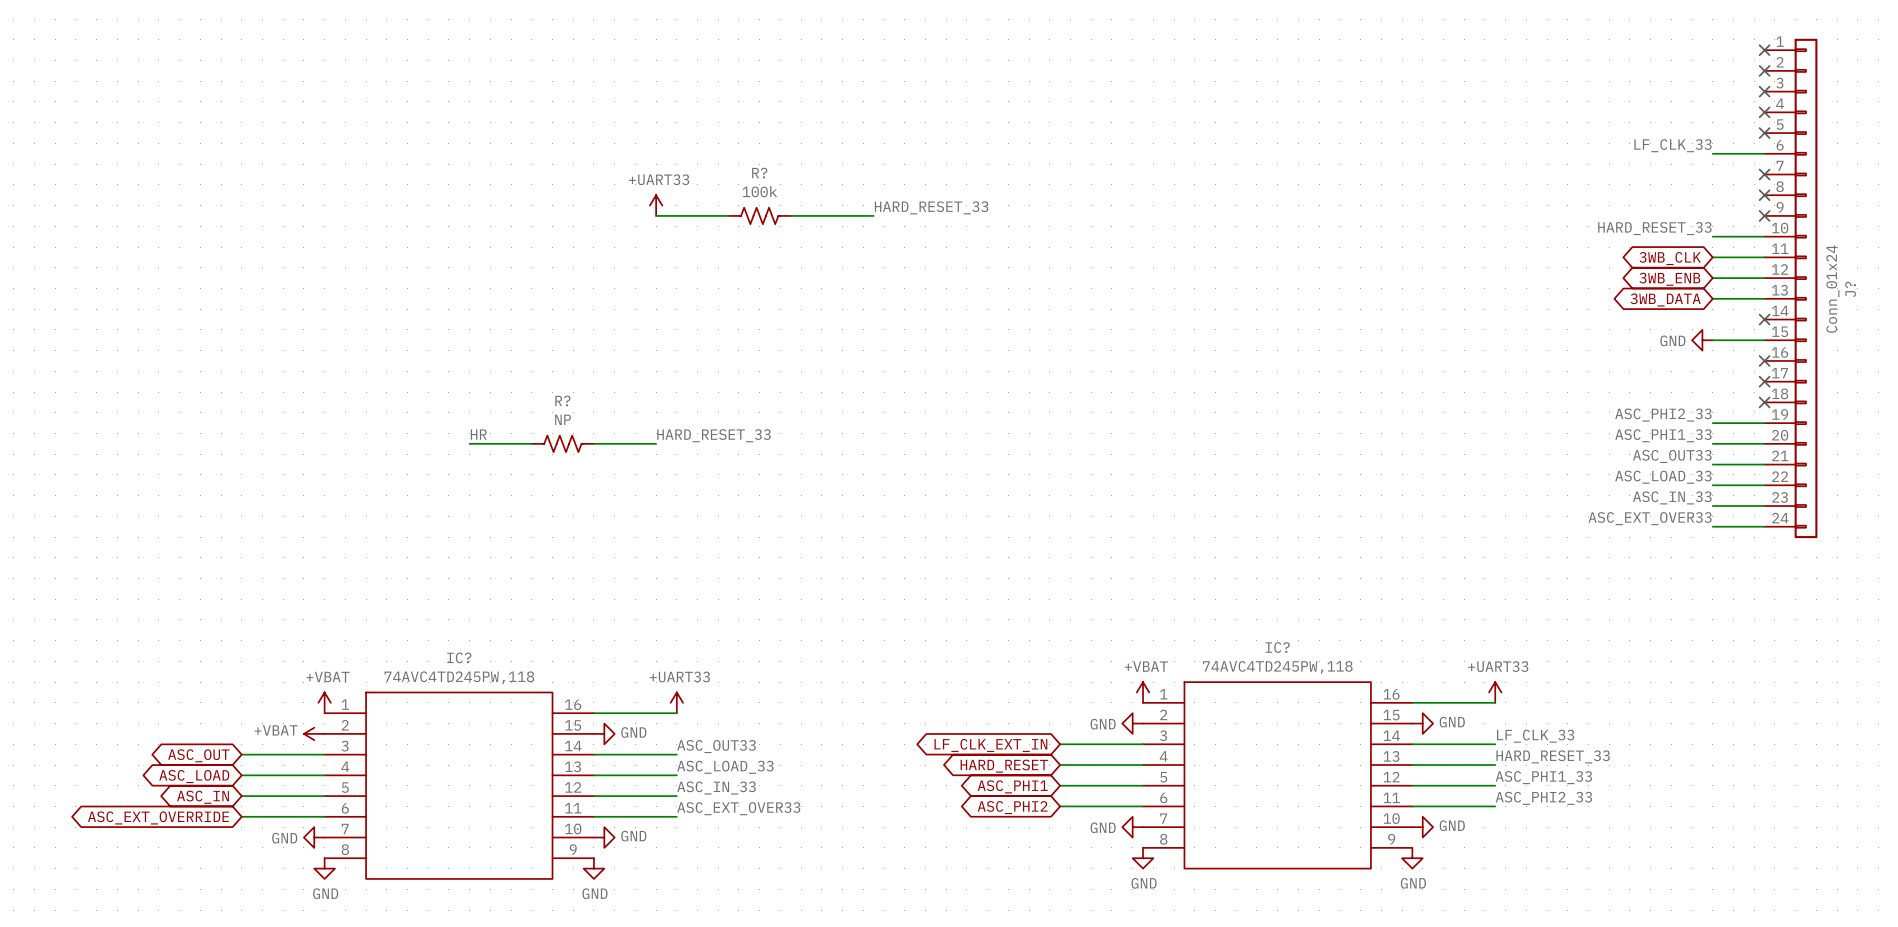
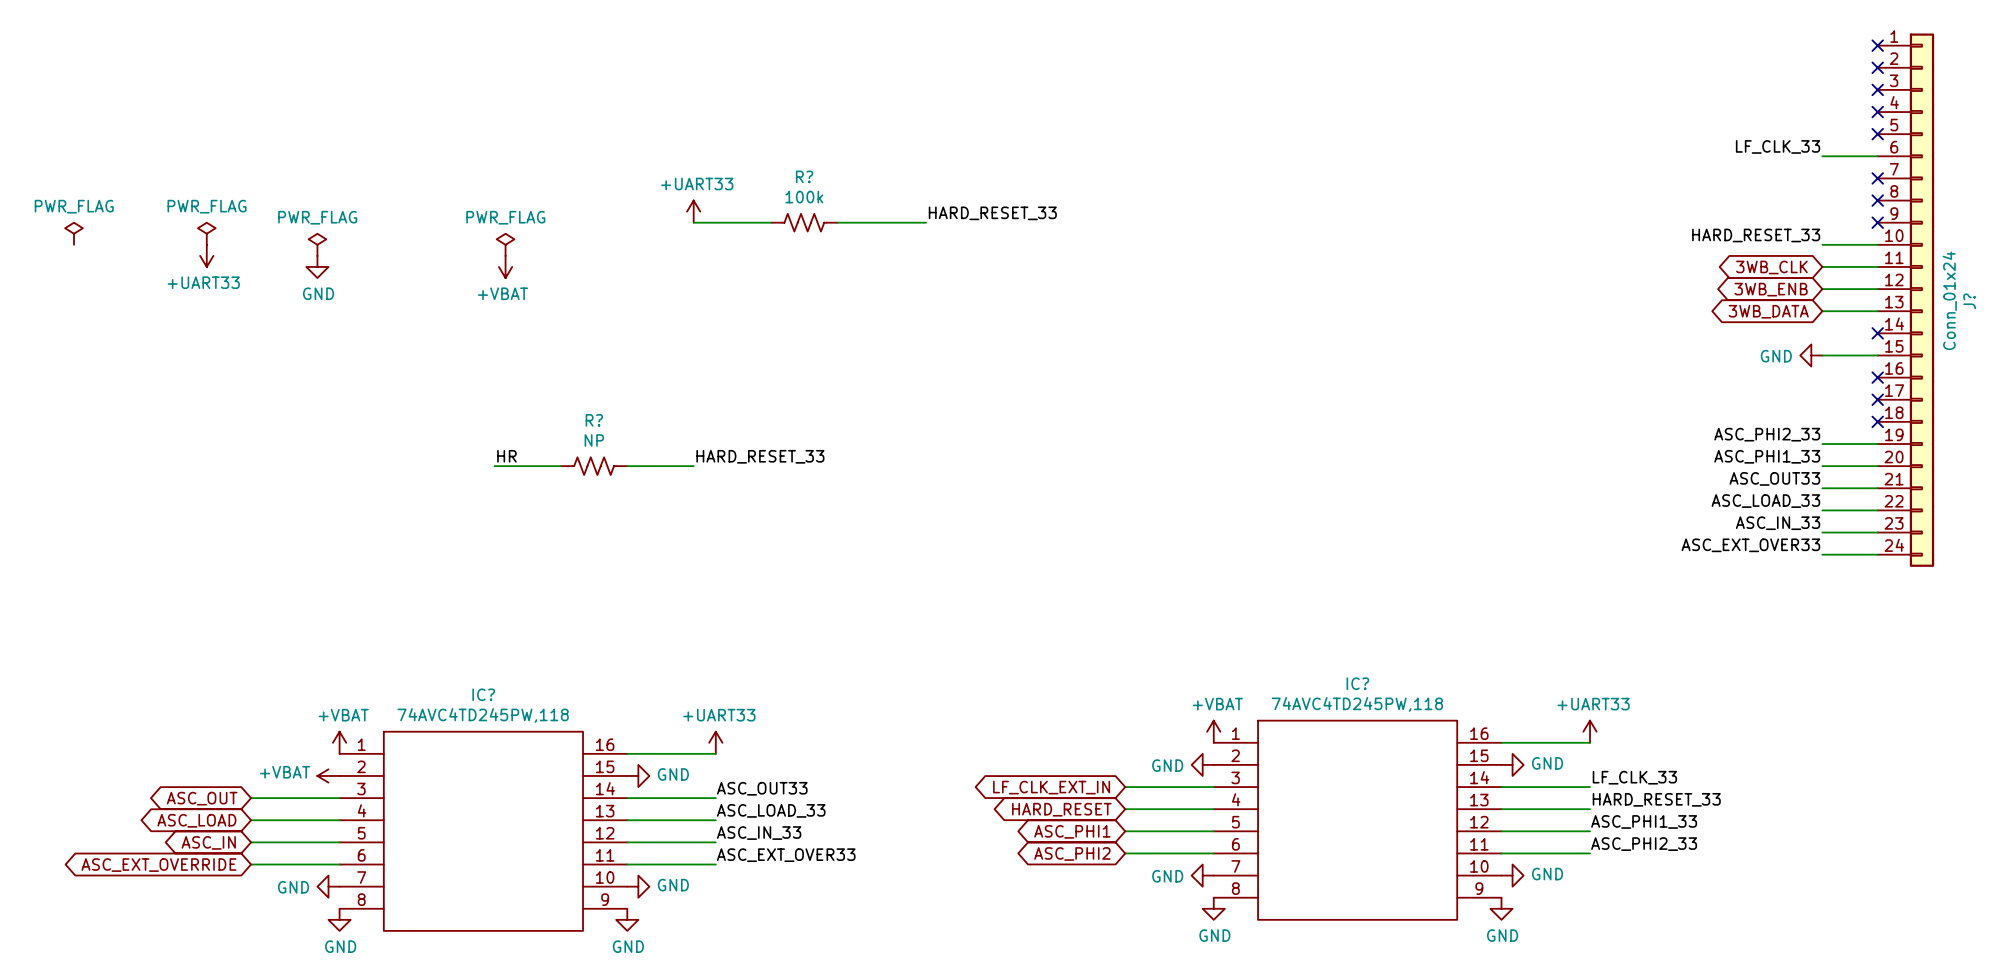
power symbol: none -> PWR_FLAG (73, 233)
power symbol: none -> PWR_FLAG (206, 233)
power symbol: none -> PWR_FLAG (317, 244)
power symbol: none -> PWR_FLAG (505, 244)
power symbol: none -> +UART33 (206, 255)
power symbol: none -> GND (317, 266)
power symbol: none -> +VBAT (505, 266)

